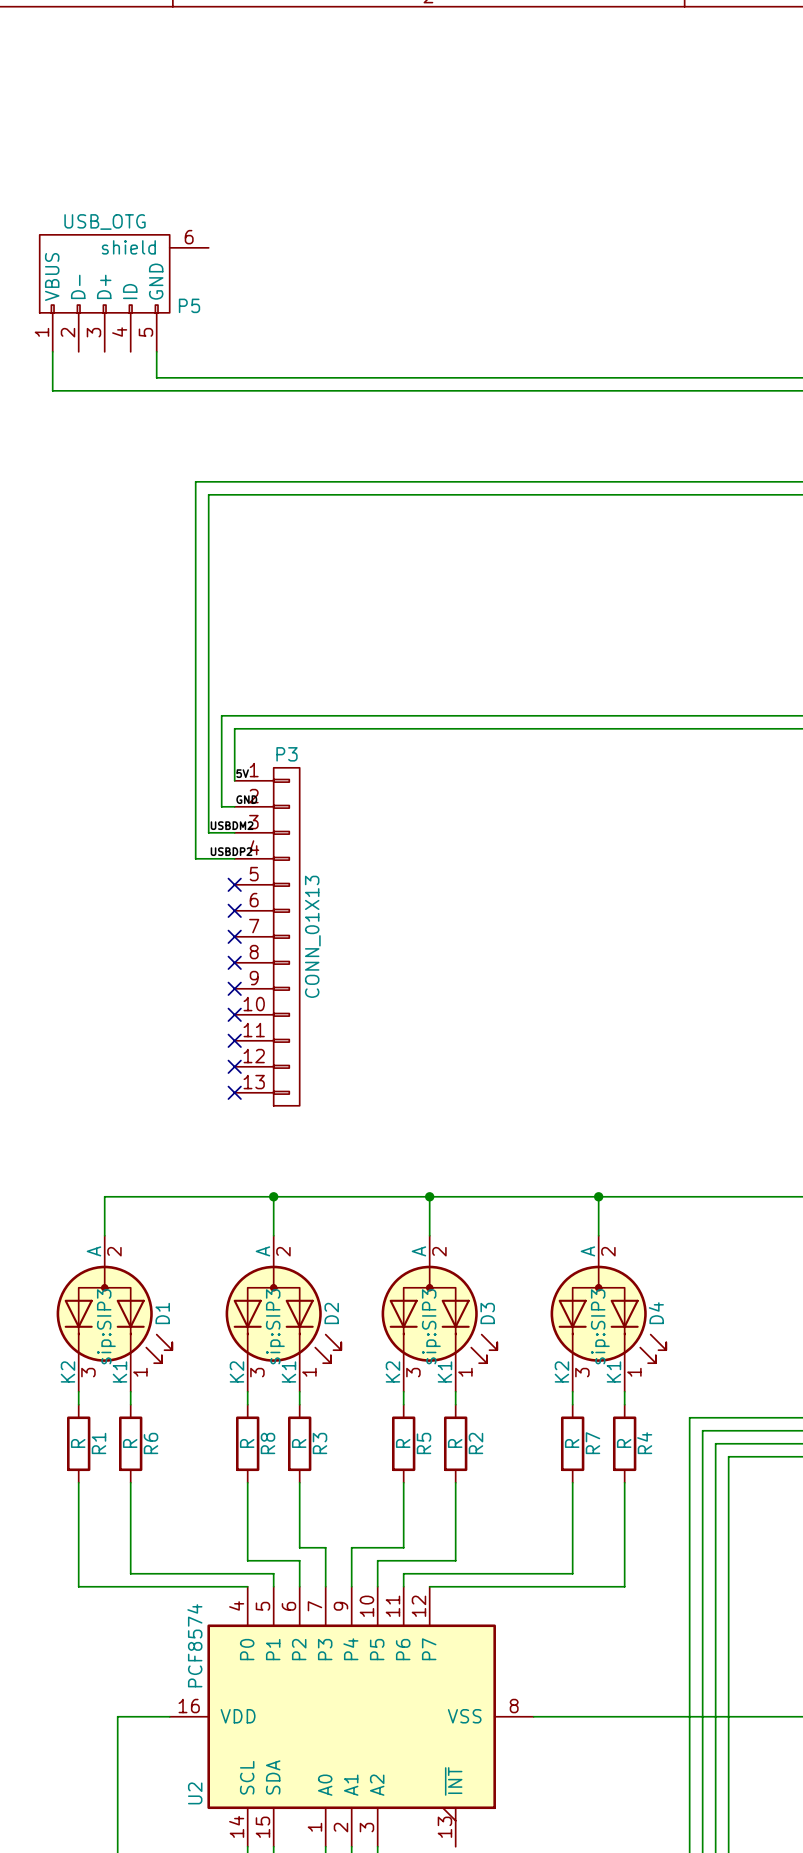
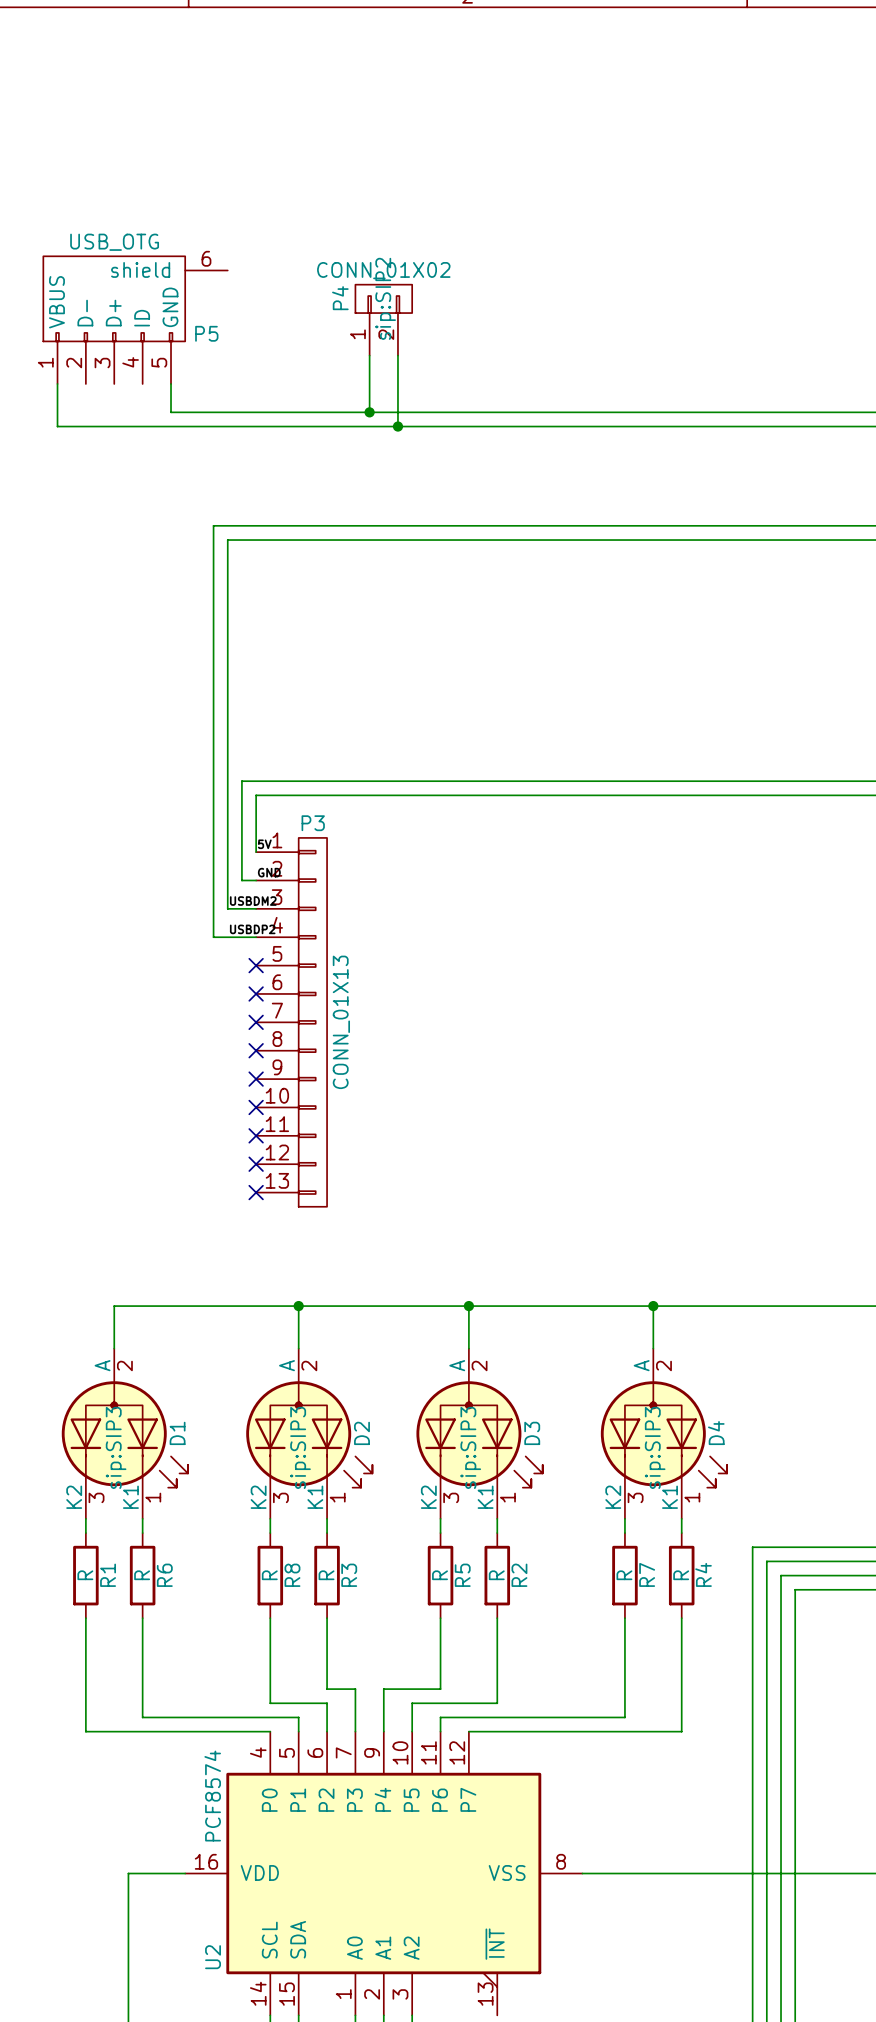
P4: none -> CONN_01X02 (383, 320)
wire: none -> (369, 355) (369, 412)
wire: none -> (397, 355) (397, 426)
junction: none -> (369, 412)
junction: none -> (397, 426)

